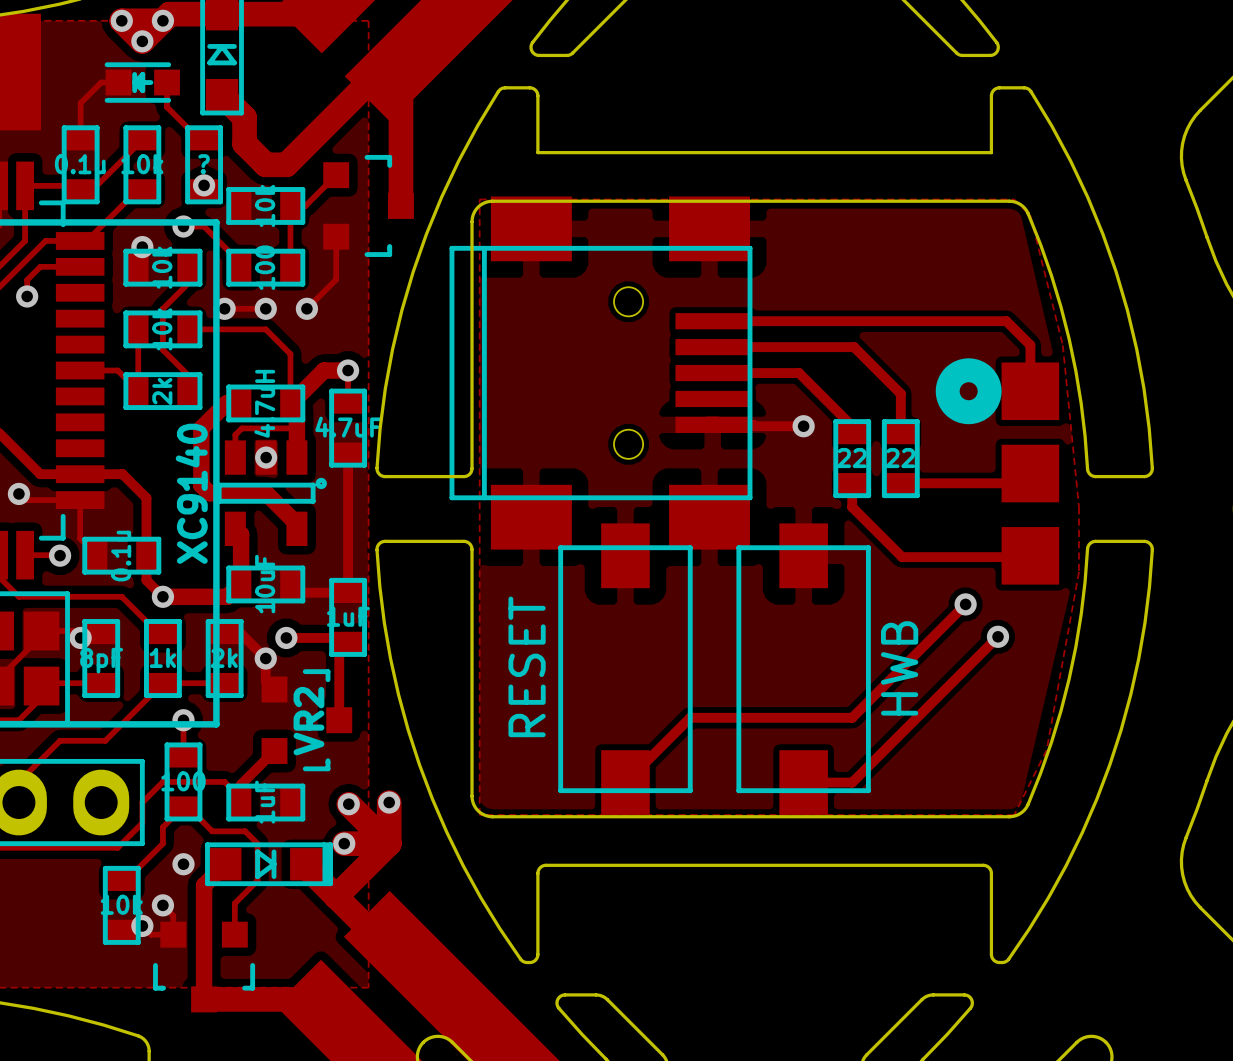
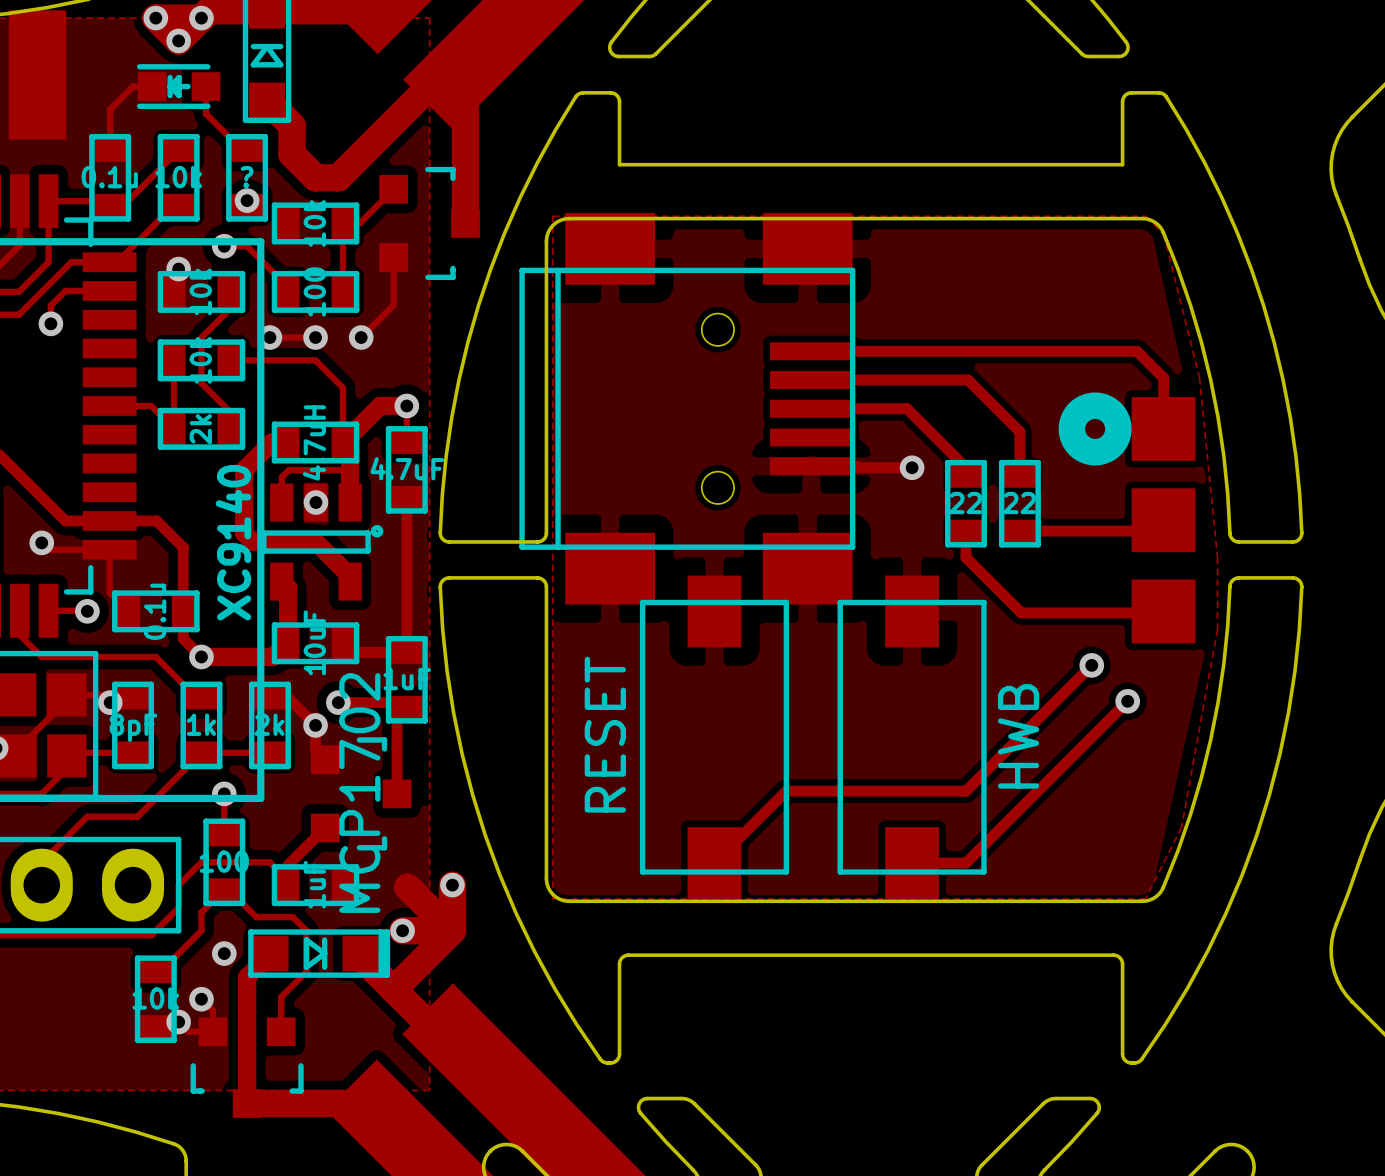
board edge: (505, 87) (530, 87) (536, 91) (537, 152) (991, 152) (992, 91) (998, 87) (1028, 88) (1051, 125) (1070, 161) (1102, 234) (1116, 271) (1136, 349) (1143, 388) (1149, 428) (1151, 472) (1145, 476) (1095, 476) (1088, 471) (1075, 370) (1060, 306) (1028, 213) (1024, 207) (1016, 202) (492, 201) (480, 205) (474, 211) (472, 219) (471, 471) (463, 476) (380, 475) (377, 468) (385, 388) (401, 310) (413, 271) (426, 234) (458, 161) (498, 91) (505, 87) -> (583, 92) (576, 96) (555, 129) (520, 198) (490, 269) (478, 305) (458, 380) (446, 455) (440, 532) (444, 540) (537, 541) (545, 536) (546, 238) (549, 230) (555, 223) (569, 218) (1142, 218) (1152, 221) (1163, 232) (1190, 305) (1201, 342) (1218, 417) (1223, 456) (1230, 536) (1238, 541) (1293, 541) (1300, 537) (1299, 494) (1290, 417) (1274, 342) (1263, 305) (1251, 269) (1222, 198) (1186, 129) (1163, 93) (1130, 92) (1123, 97) (1122, 164) (619, 164) (618, 97) (611, 92) (583, 92)
board edge: (385, 541) (463, 541) (471, 546) (472, 798) (478, 810) (484, 815) (492, 816) (1016, 815) (1022, 811) (1028, 804) (1060, 711) (1075, 647) (1088, 546) (1094, 541) (1145, 541) (1150, 543) (1152, 549) (1144, 622) (1138, 658) (1130, 694) (1109, 764) (1082, 832) (1066, 865) (1029, 928) (1006, 961) (997, 962) (991, 956) (991, 872) (985, 865) (545, 865) (540, 867) (537, 872) (537, 955) (533, 961) (527, 962) (520, 959) (499, 928) (463, 865) (446, 832) (419, 764) (398, 694) (384, 622) (377, 548) (379, 543) (385, 541) -> (449, 577) (442, 580) (440, 587) (447, 671) (462, 754) (485, 835) (499, 874) (534, 951) (576, 1024) (600, 1059) (607, 1062) (615, 1061) (619, 1055) (619, 963) (622, 957) (628, 955) (1115, 955) (1122, 963) (1122, 1056) (1129, 1062) (1139, 1061) (1165, 1024) (1207, 951) (1225, 913) (1256, 835) (1279, 754) (1288, 712) (1294, 671) (1301, 587) (1299, 580) (1292, 577) (1237, 577) (1230, 583) (1223, 663) (1218, 702) (1201, 777) (1190, 814) (1163, 887) (1157, 895) (1150, 899) (569, 901) (560, 899) (553, 894) (546, 881) (545, 583) (537, 577) (449, 577)
VR2 value: none -> MCP1702 (359, 793)
VR2 name: VR2 (308, 721) -> none
via: (348, 804) -> none

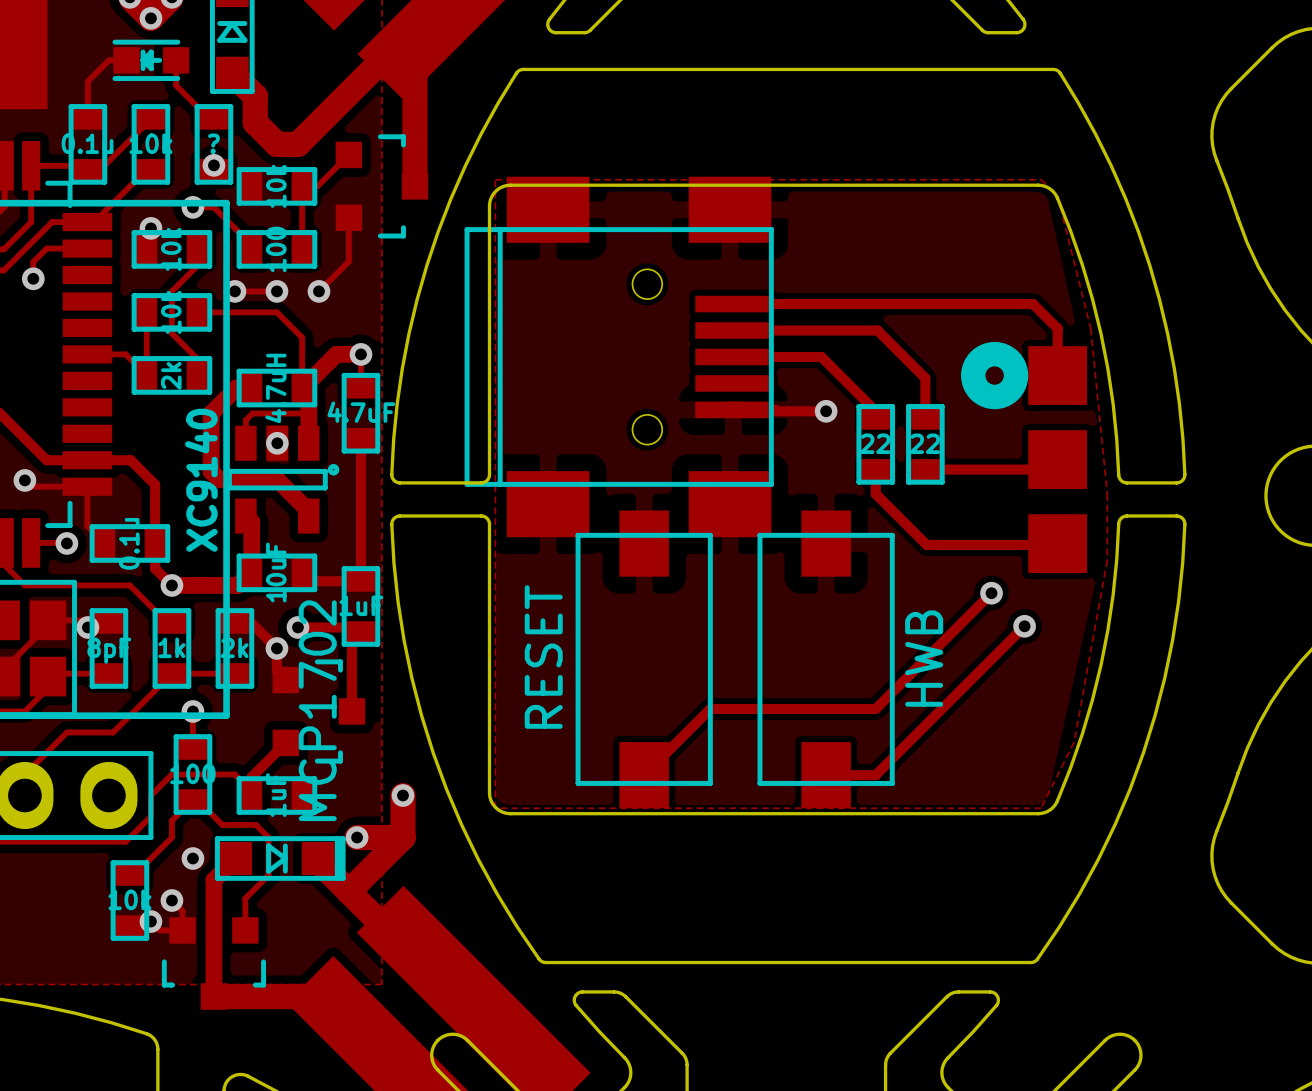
board edge: (546, 245) (547, 235) (551, 227) (560, 220) (569, 218) (1150, 219) (1158, 225) (1163, 232) (1177, 268) (1201, 342) (1218, 417) (1223, 456) (1230, 536) (1237, 541) (1292, 541) (1299, 539) (1301, 532) (1295, 455) (1290, 417) (1274, 342) (1263, 305) (1251, 269) (1222, 198) (1186, 129) (1163, 93) (1130, 92) (1123, 97) (1122, 164) (619, 164) (618, 97) (611, 92) (583, 92) (575, 96) (537, 163) (520, 198) (490, 269) (478, 305) (458, 380) (446, 455) (442, 494) (440, 533) (446, 541) (538, 541) (543, 539) (546, 532) -> (489, 206) (491, 198) (495, 191) (502, 186) (510, 185) (1045, 186) (1053, 191) (1057, 197) (1070, 231) (1092, 298) (1107, 368) (1113, 403) (1119, 477) (1125, 482) (1176, 482) (1182, 480) (1184, 474) (1179, 403) (1174, 368) (1167, 333) (1149, 265) (1125, 198) (1111, 166) (1078, 103) (1059, 72) (1053, 69) (523, 69) (518, 71) (480, 134) (465, 166) (438, 231) (426, 265) (408, 333) (397, 403) (393, 439) (391, 475) (397, 482) (482, 482) (488, 478) (489, 471)
board edge: (546, 590) (545, 582) (538, 577) (449, 577) (443, 579) (440, 587) (447, 671) (453, 712) (472, 794) (499, 874) (516, 913) (554, 988) (601, 1060) (612, 1062) (619, 1056) (619, 963) (626, 955) (1113, 955) (1119, 957) (1122, 963) (1122, 1055) (1127, 1061) (1134, 1062) (1141, 1059) (1165, 1024) (1207, 951) (1225, 913) (1256, 835) (1279, 754) (1288, 712) (1294, 671) (1301, 587) (1299, 580) (1292, 577) (1237, 577) (1230, 583) (1223, 663) (1218, 702) (1201, 777) (1190, 814) (1163, 887) (1158, 894) (1150, 899) (569, 901) (560, 899) (553, 894) (548, 887) (546, 878) -> (489, 524) (487, 518) (482, 516) (400, 515) (394, 517) (391, 524) (398, 601) (404, 640) (421, 715) (446, 789) (461, 824) (497, 893) (539, 959) (545, 962) (1035, 961) (1059, 927) (1098, 859) (1115, 824) (1143, 752) (1164, 678) (1172, 640) (1178, 601) (1184, 524) (1182, 518) (1176, 515) (1125, 516) (1119, 520) (1113, 595) (1107, 630) (1092, 699) (1082, 734) (1057, 800) (1053, 807) (1045, 812) (510, 813) (502, 812) (493, 805) (490, 798) (489, 789)
track: (407, 886) (450, 930) -> none

